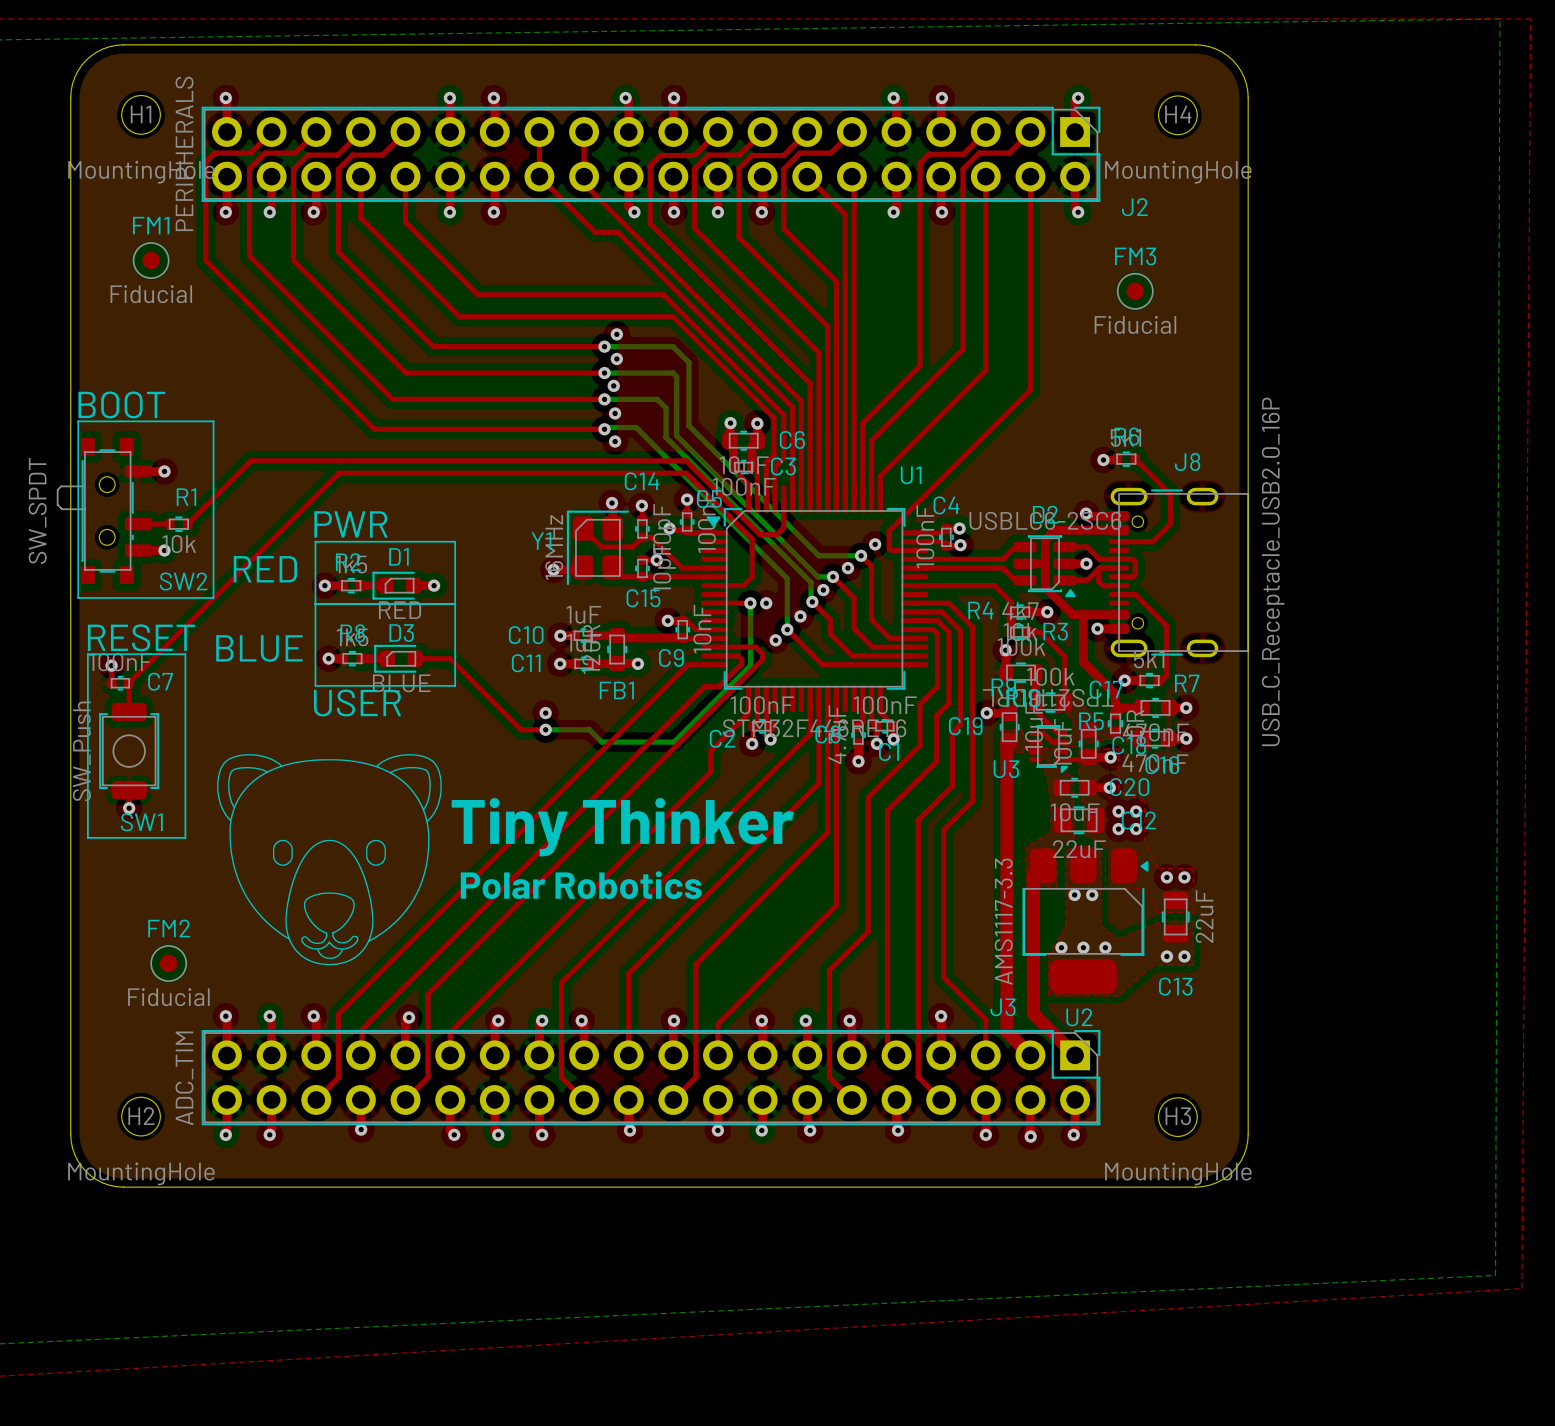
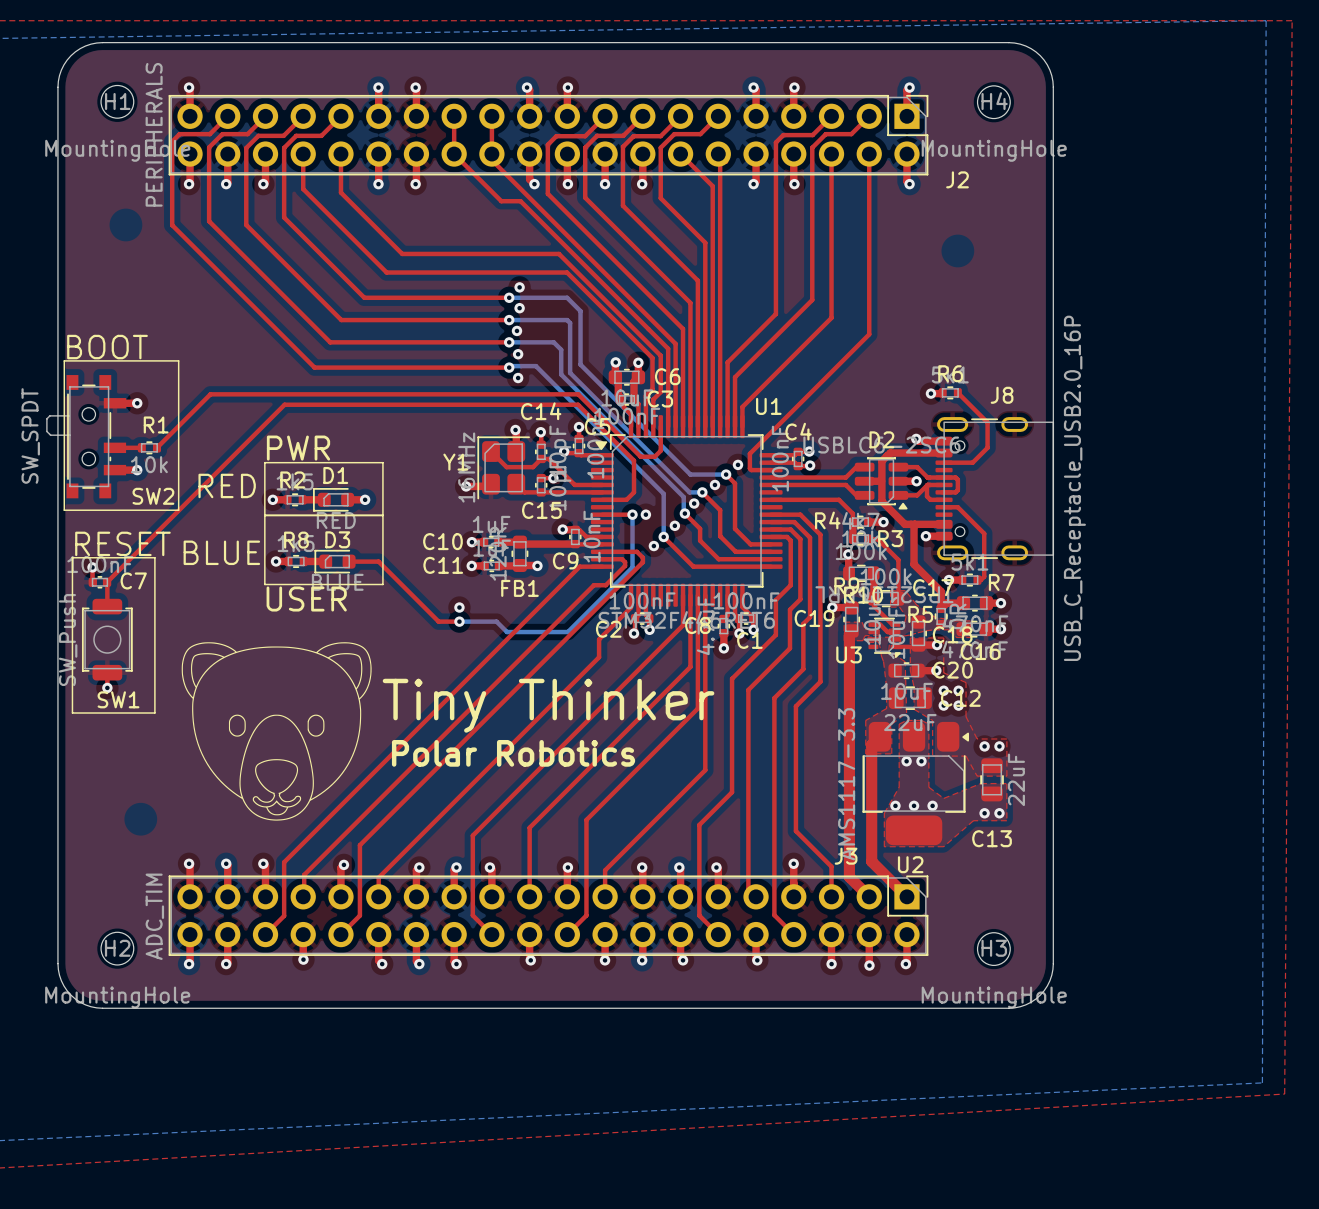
FM1: Fiducial (151, 260) -> none
FM3: Fiducial (1135, 291) -> none
FM2: Fiducial (168, 963) -> none

